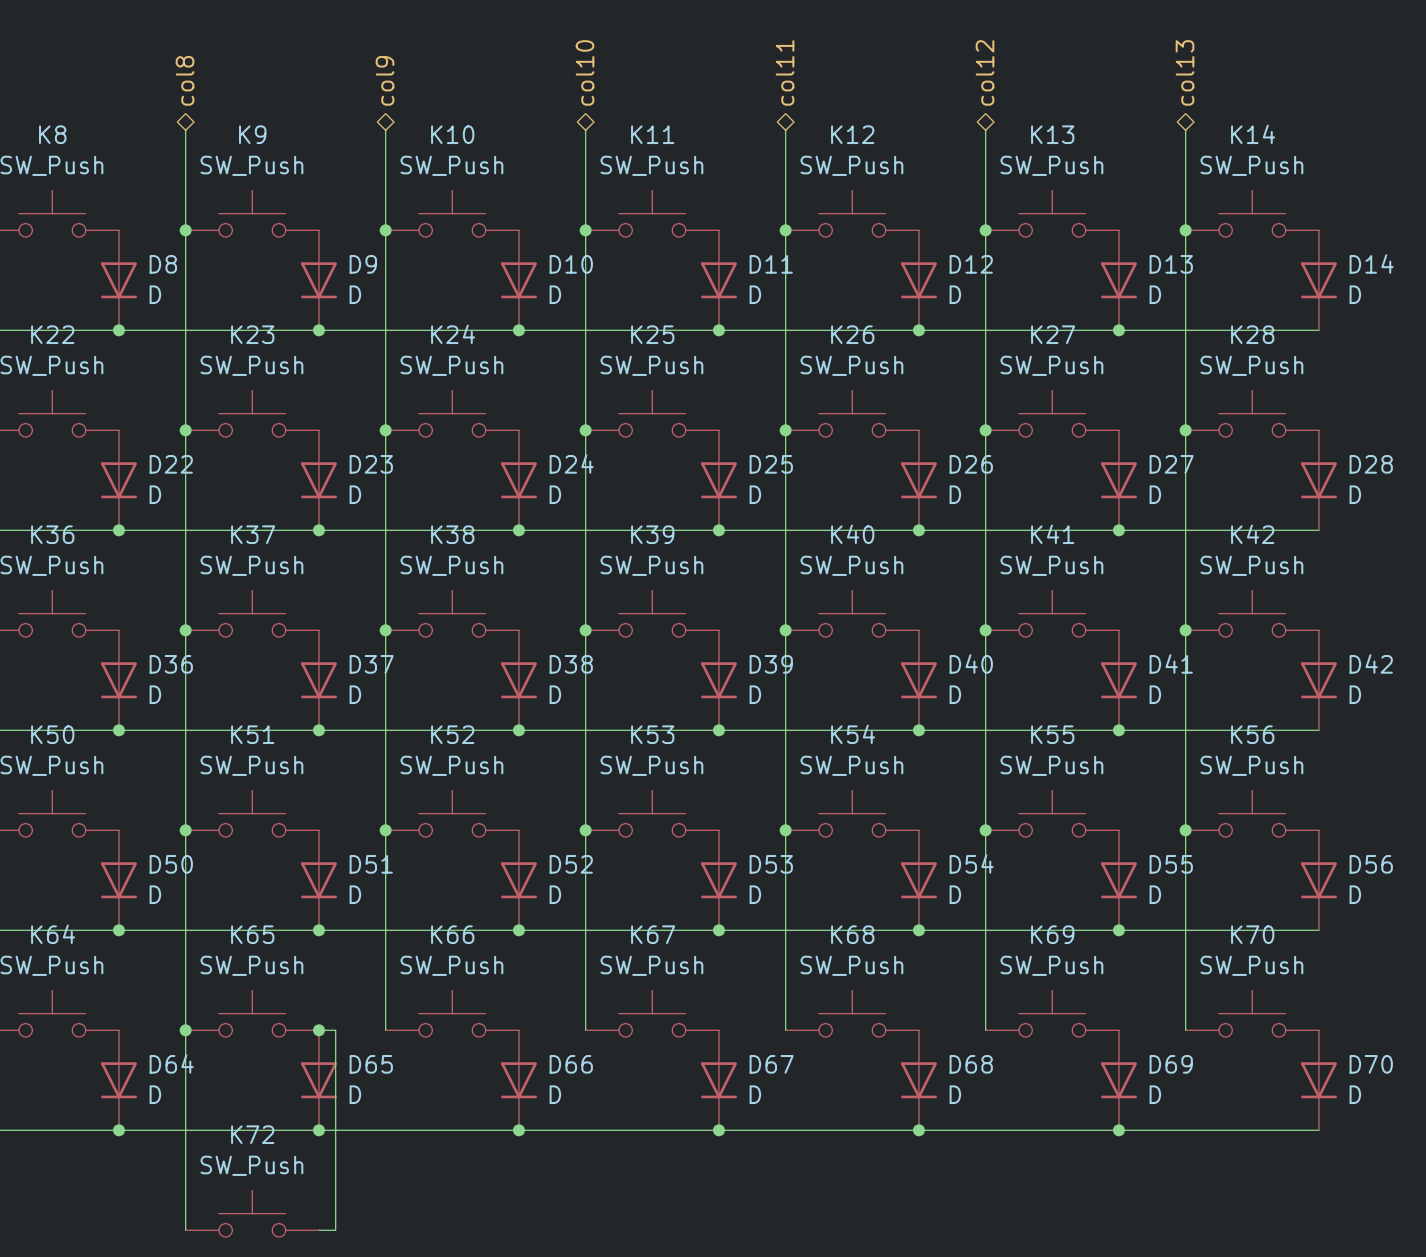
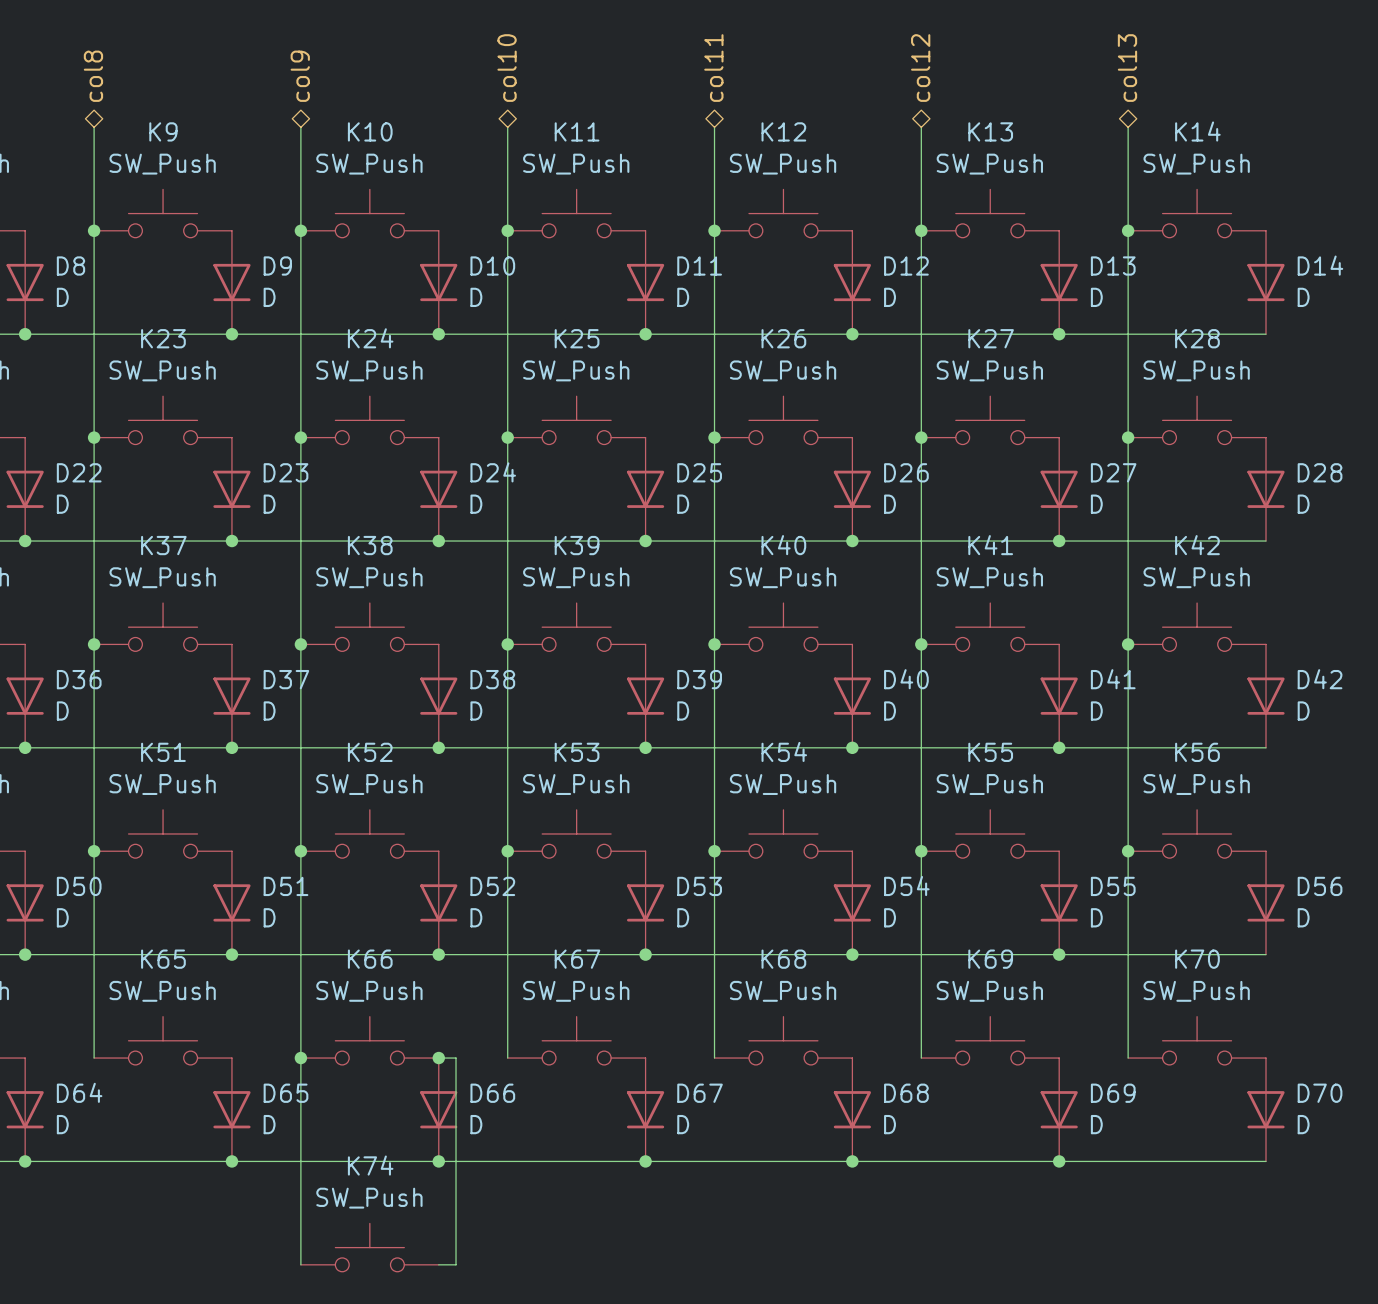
wire: (185, 1030) (185, 1230) -> (300, 1058) (300, 1264)
junction: (185, 1030) -> none
wire: (318, 1030) (335, 1030) (335, 1230) (318, 1230) -> (438, 1058) (456, 1058) (456, 1264) (438, 1264)
junction position: (318, 1030) -> (300, 1058)
junction: none -> (438, 1058)
K72: SW_Push (252, 1213) -> none
K74: none -> SW_Push (369, 1247)

